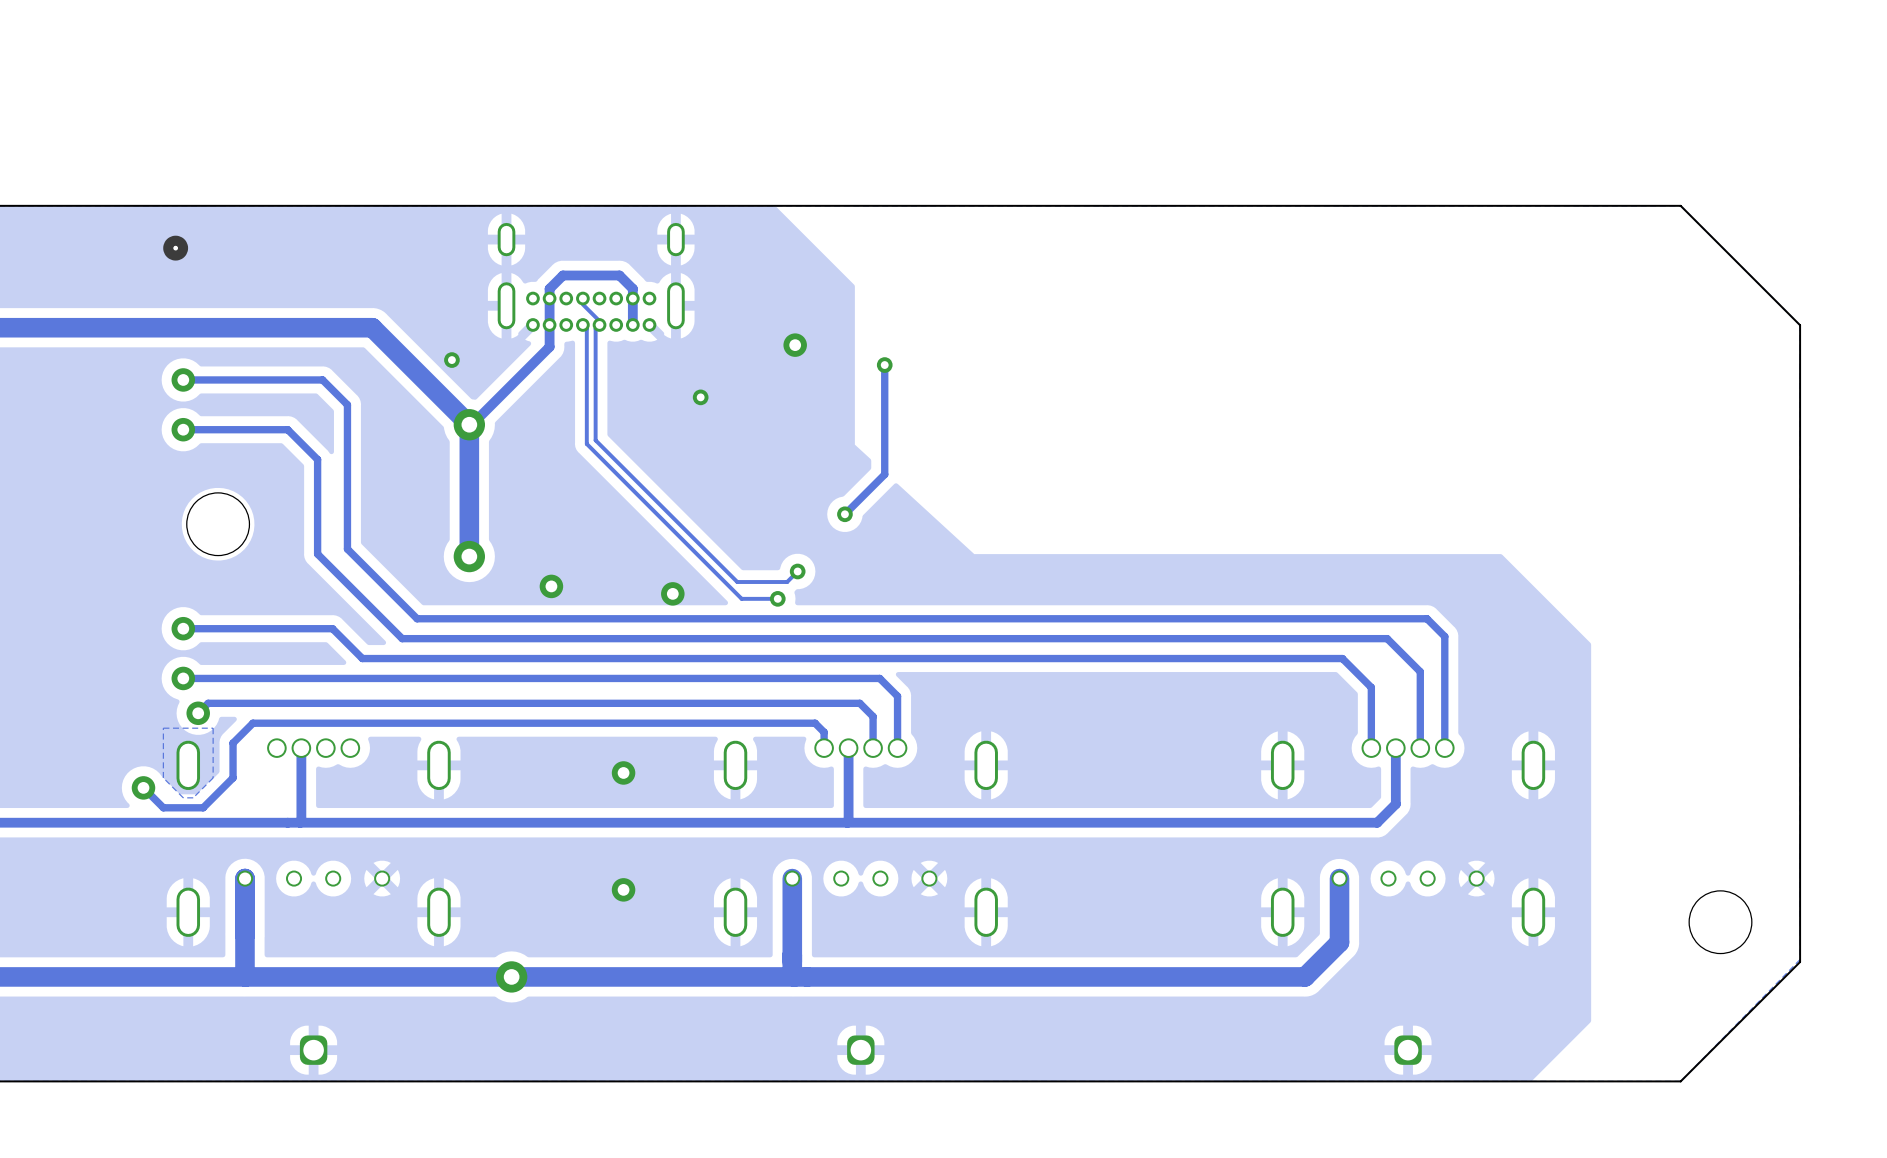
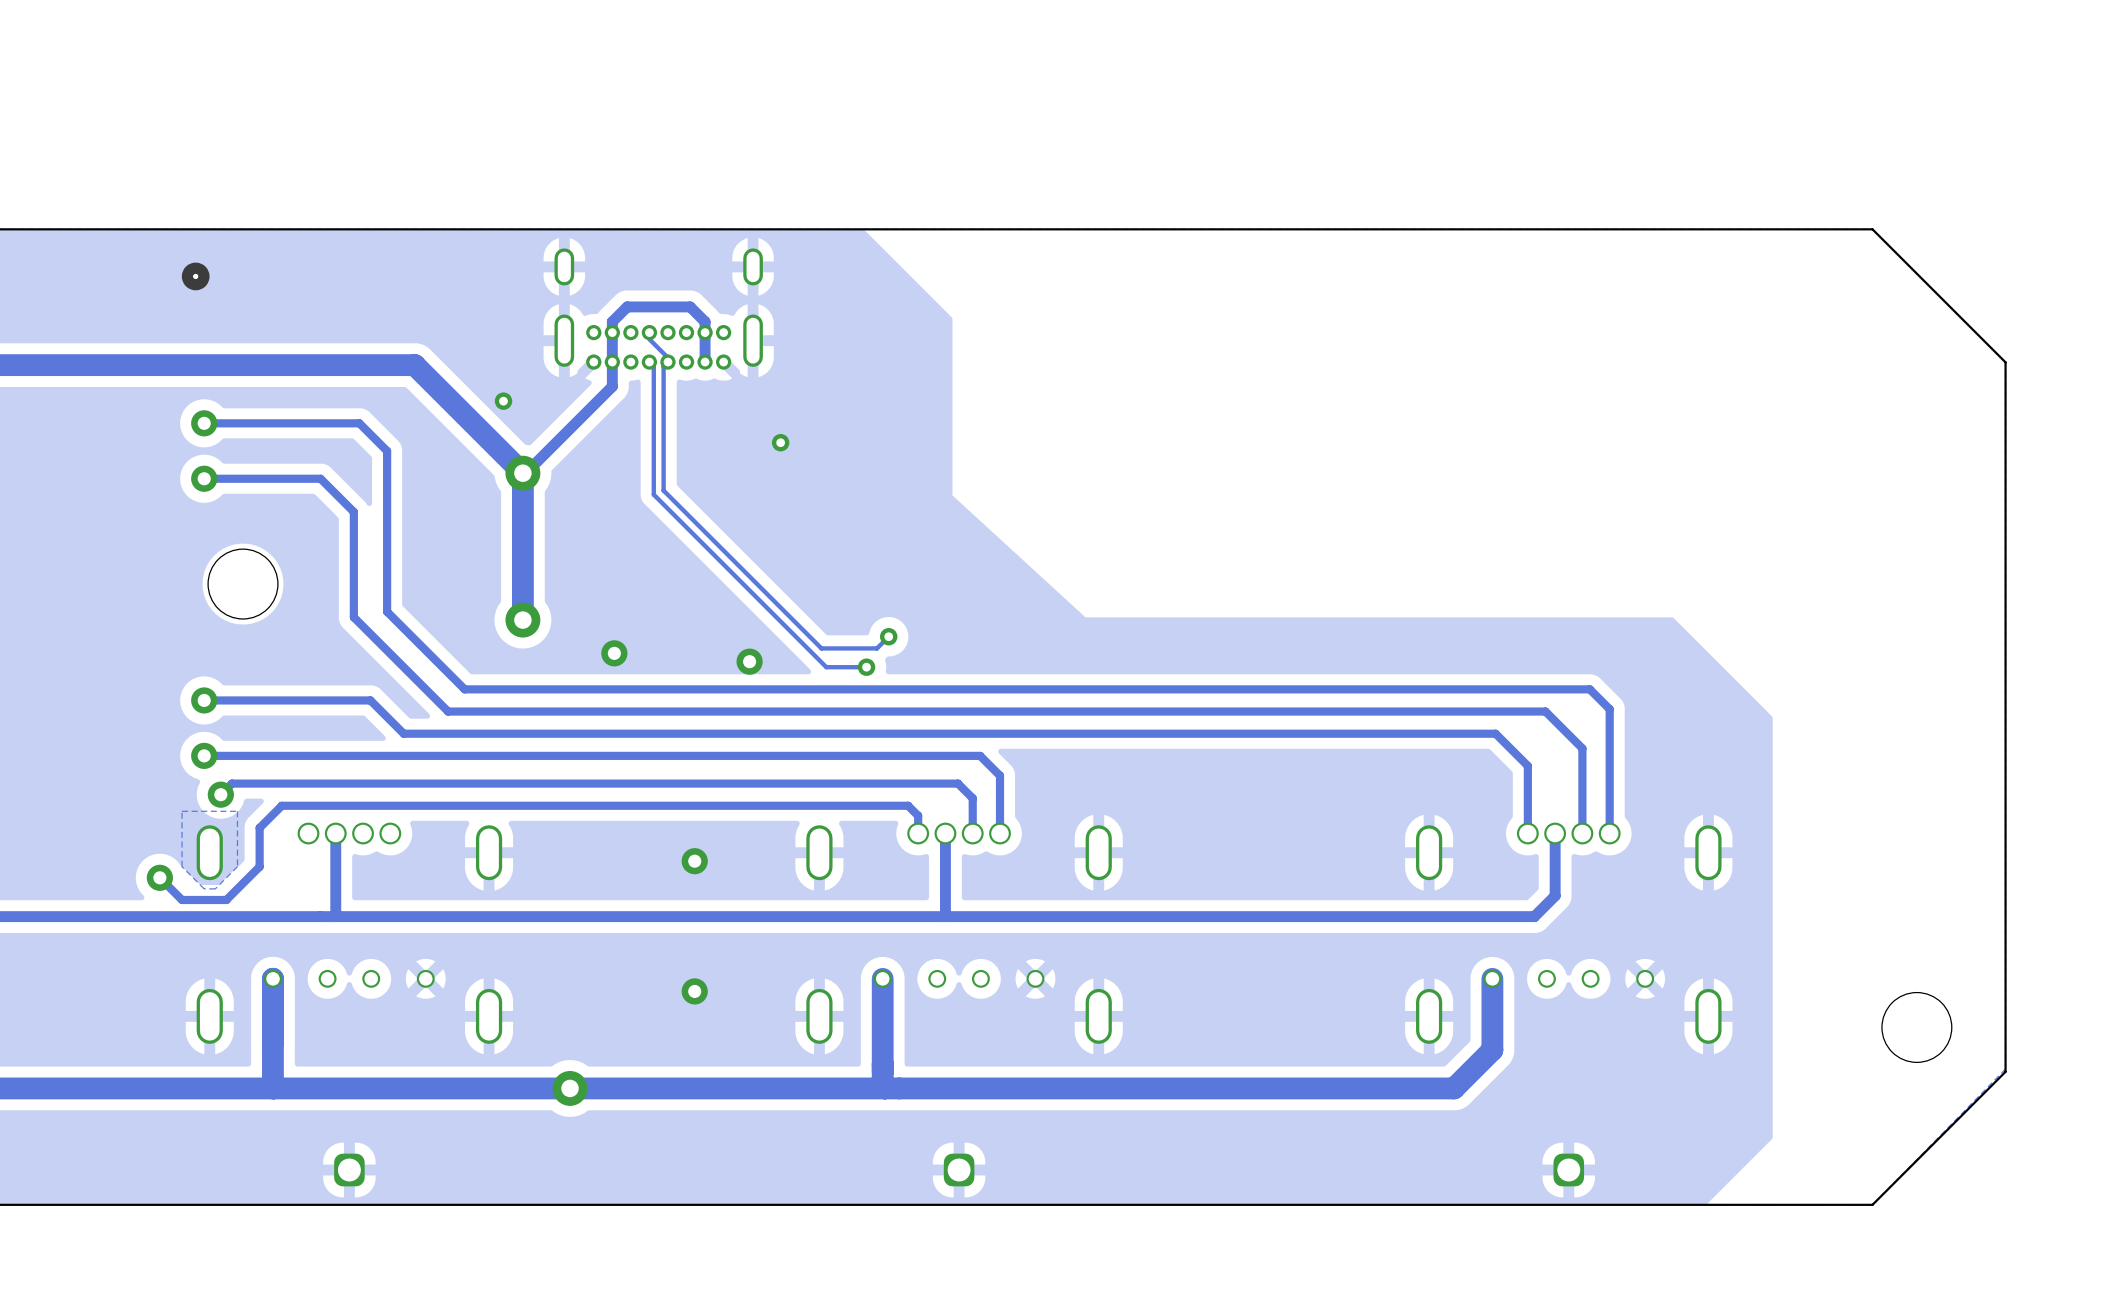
via: (795, 345) -> none
track: (884, 365) (884, 474) (844, 514) -> none
via: (884, 365) -> none
via: (844, 514) -> none

